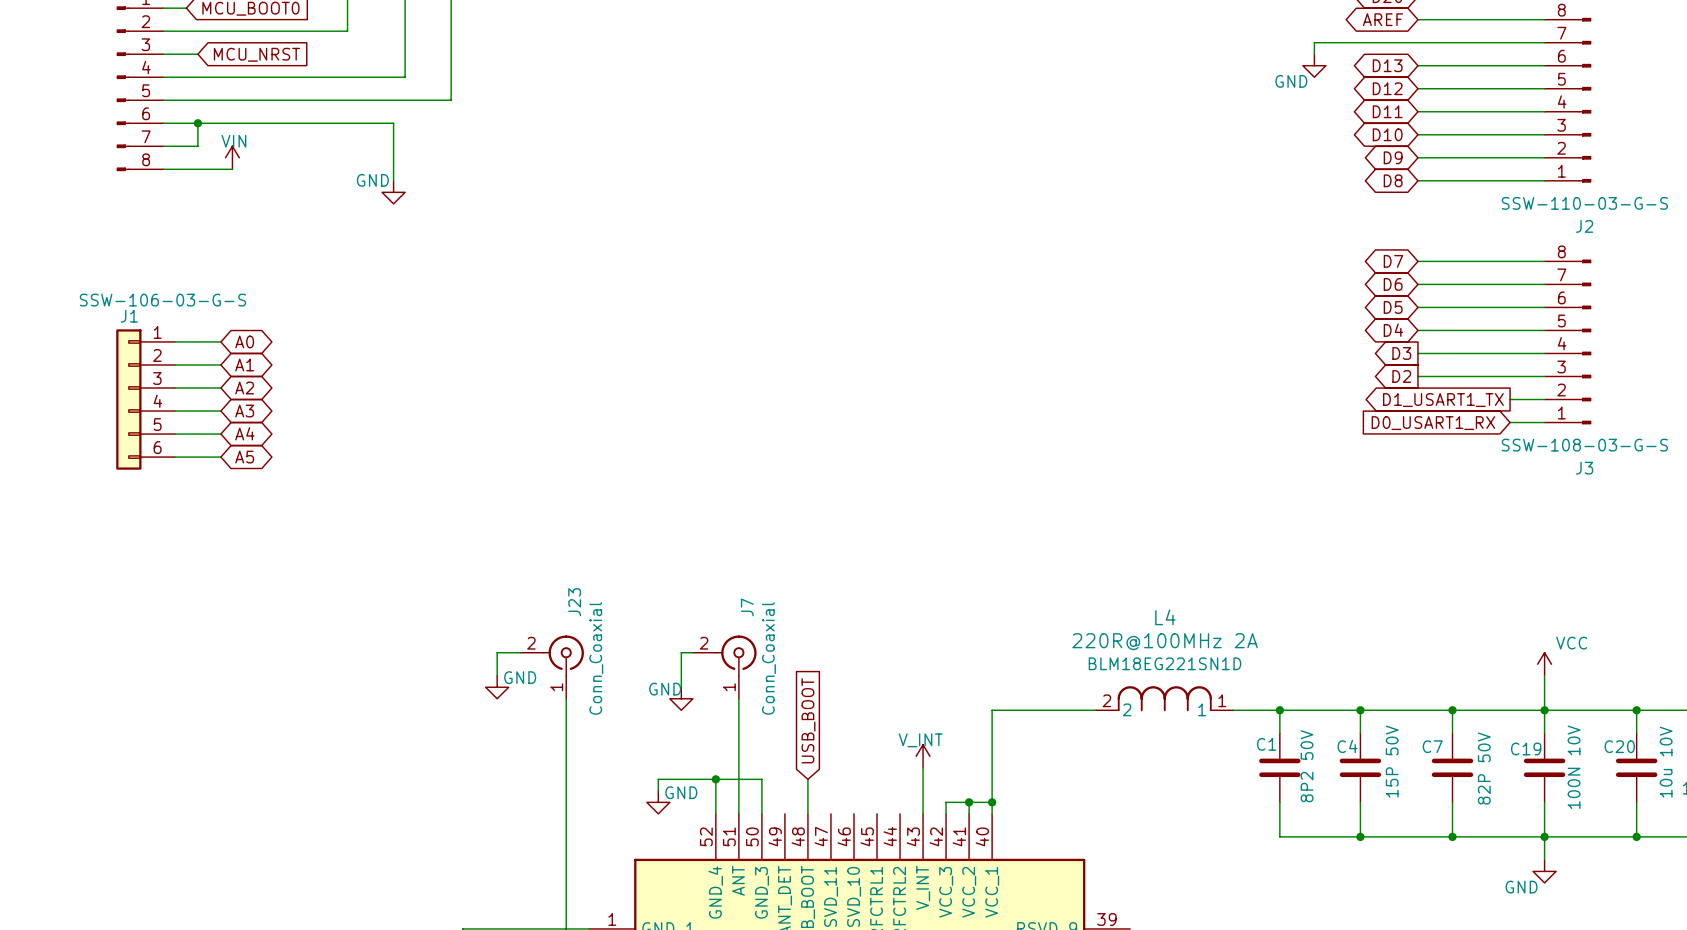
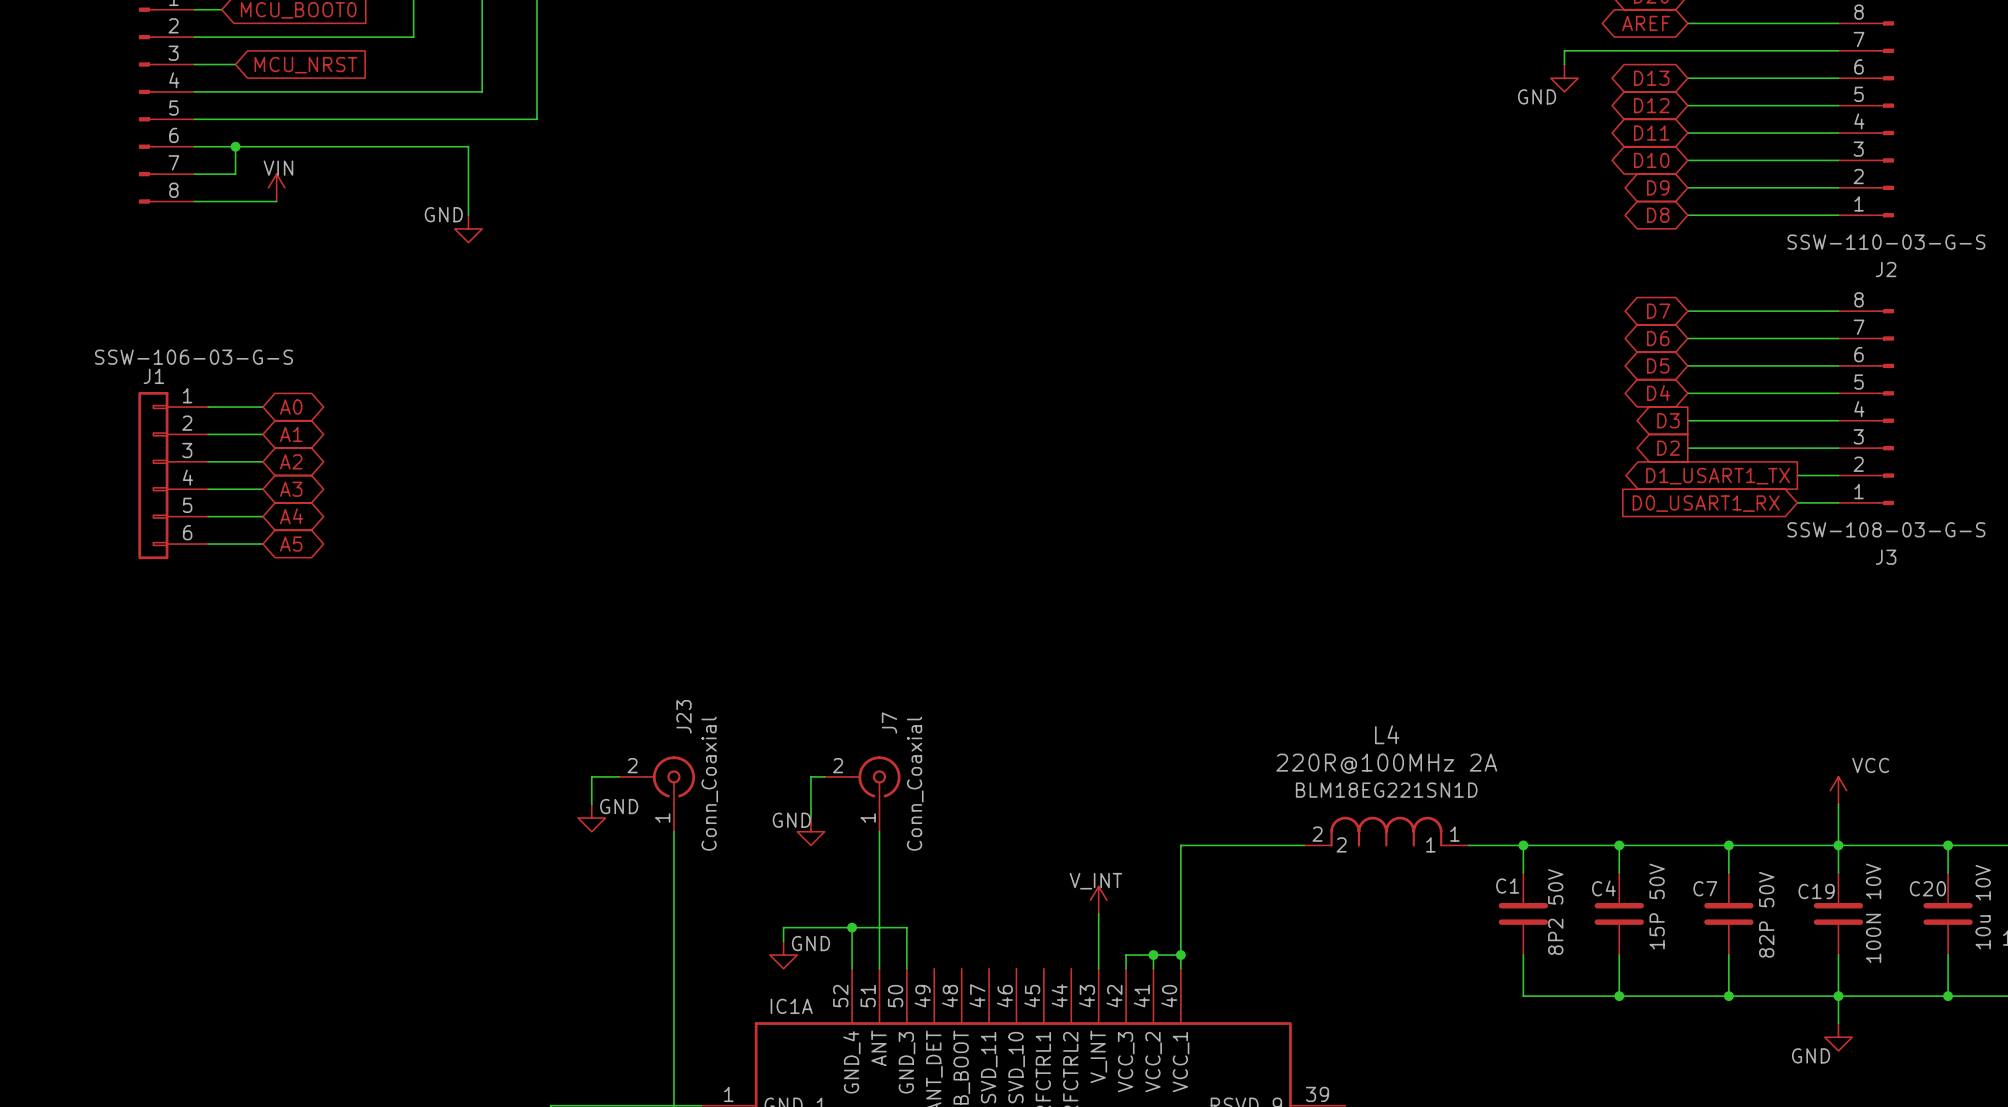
global label: USB_BOOT (808, 720) -> none
wire: (807, 779) (807, 813) -> none
IC1A name: none -> IC1A (791, 1006)

